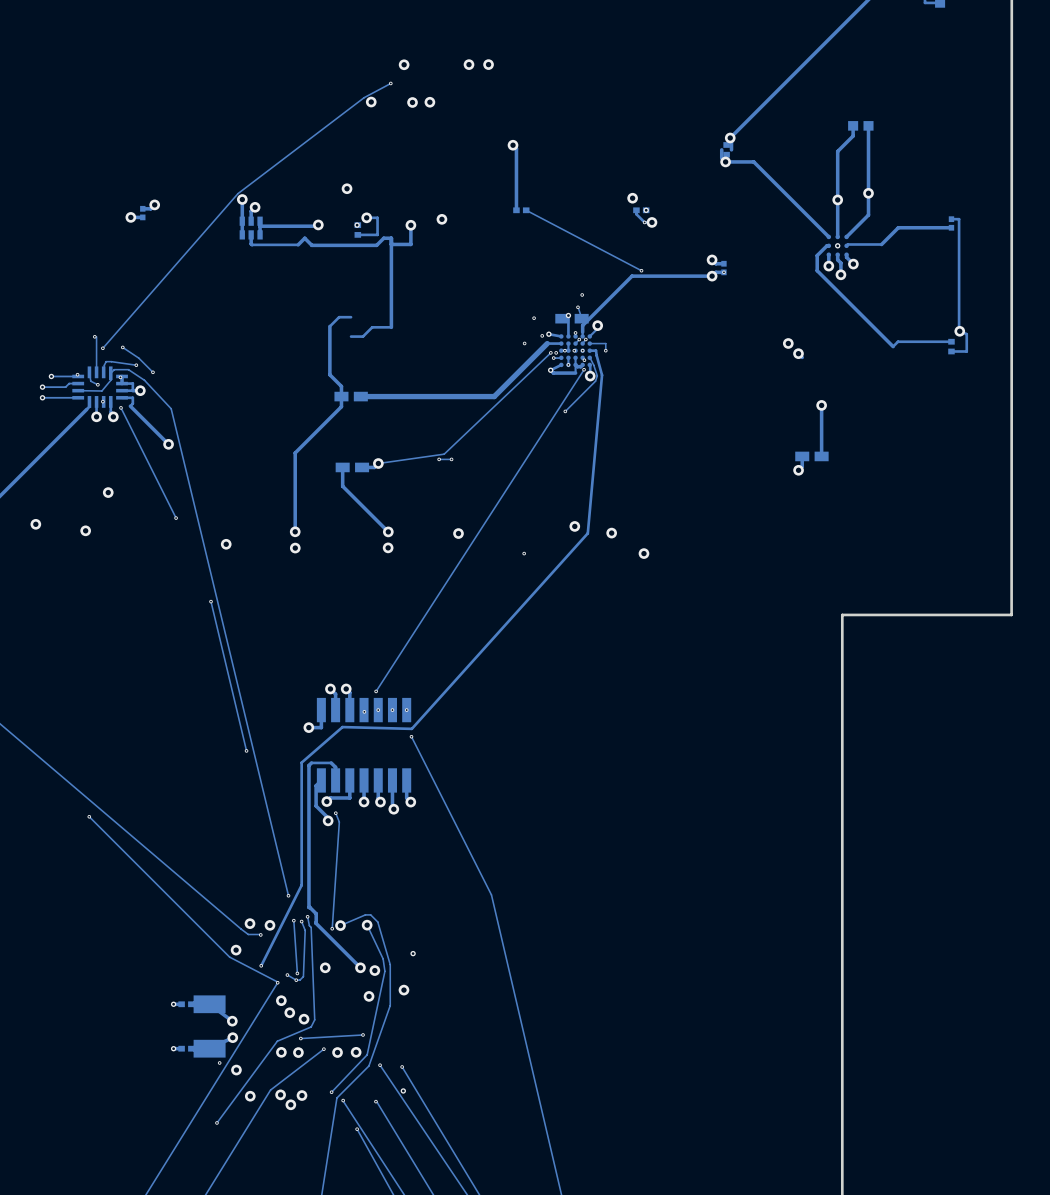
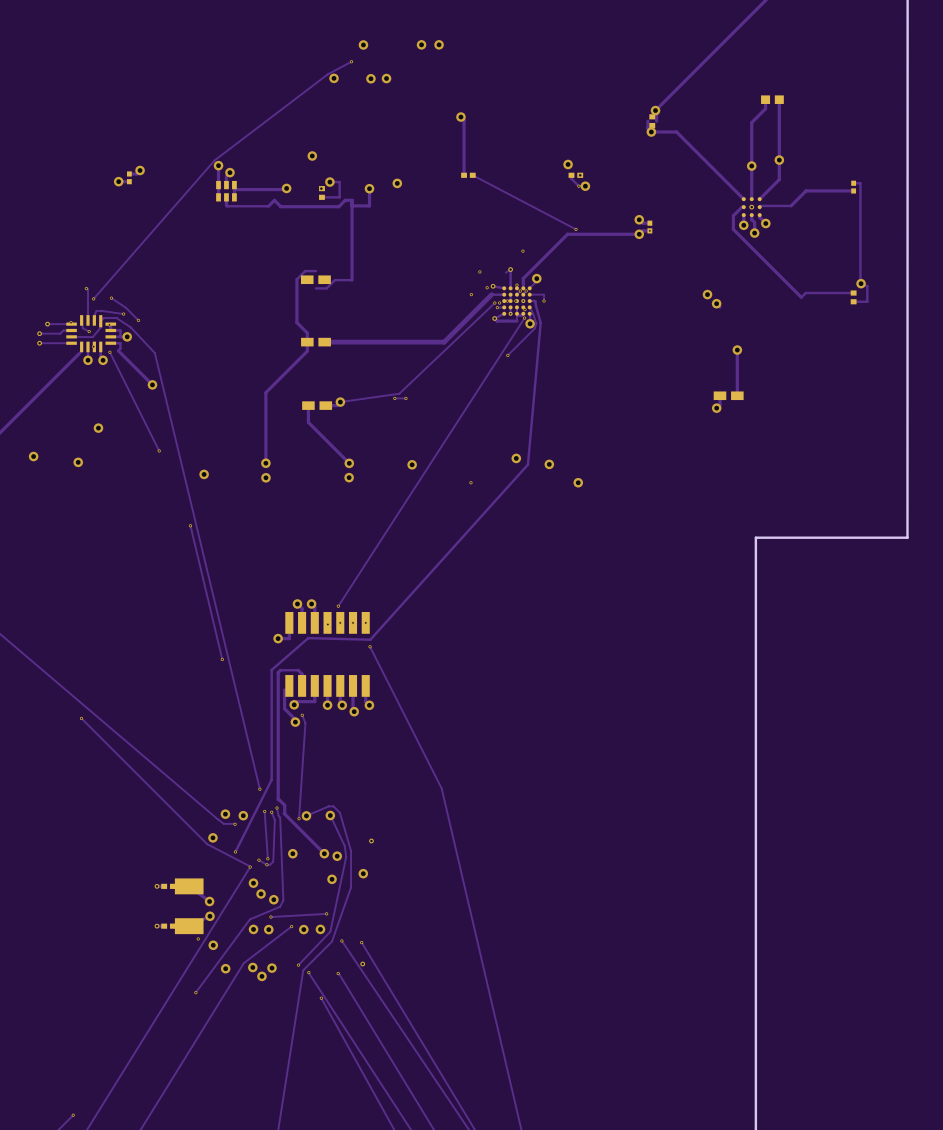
via: (577, 307) -> none
track: (578, 307) (581, 317) -> none
part position: (571, 318) -> (315, 279)

